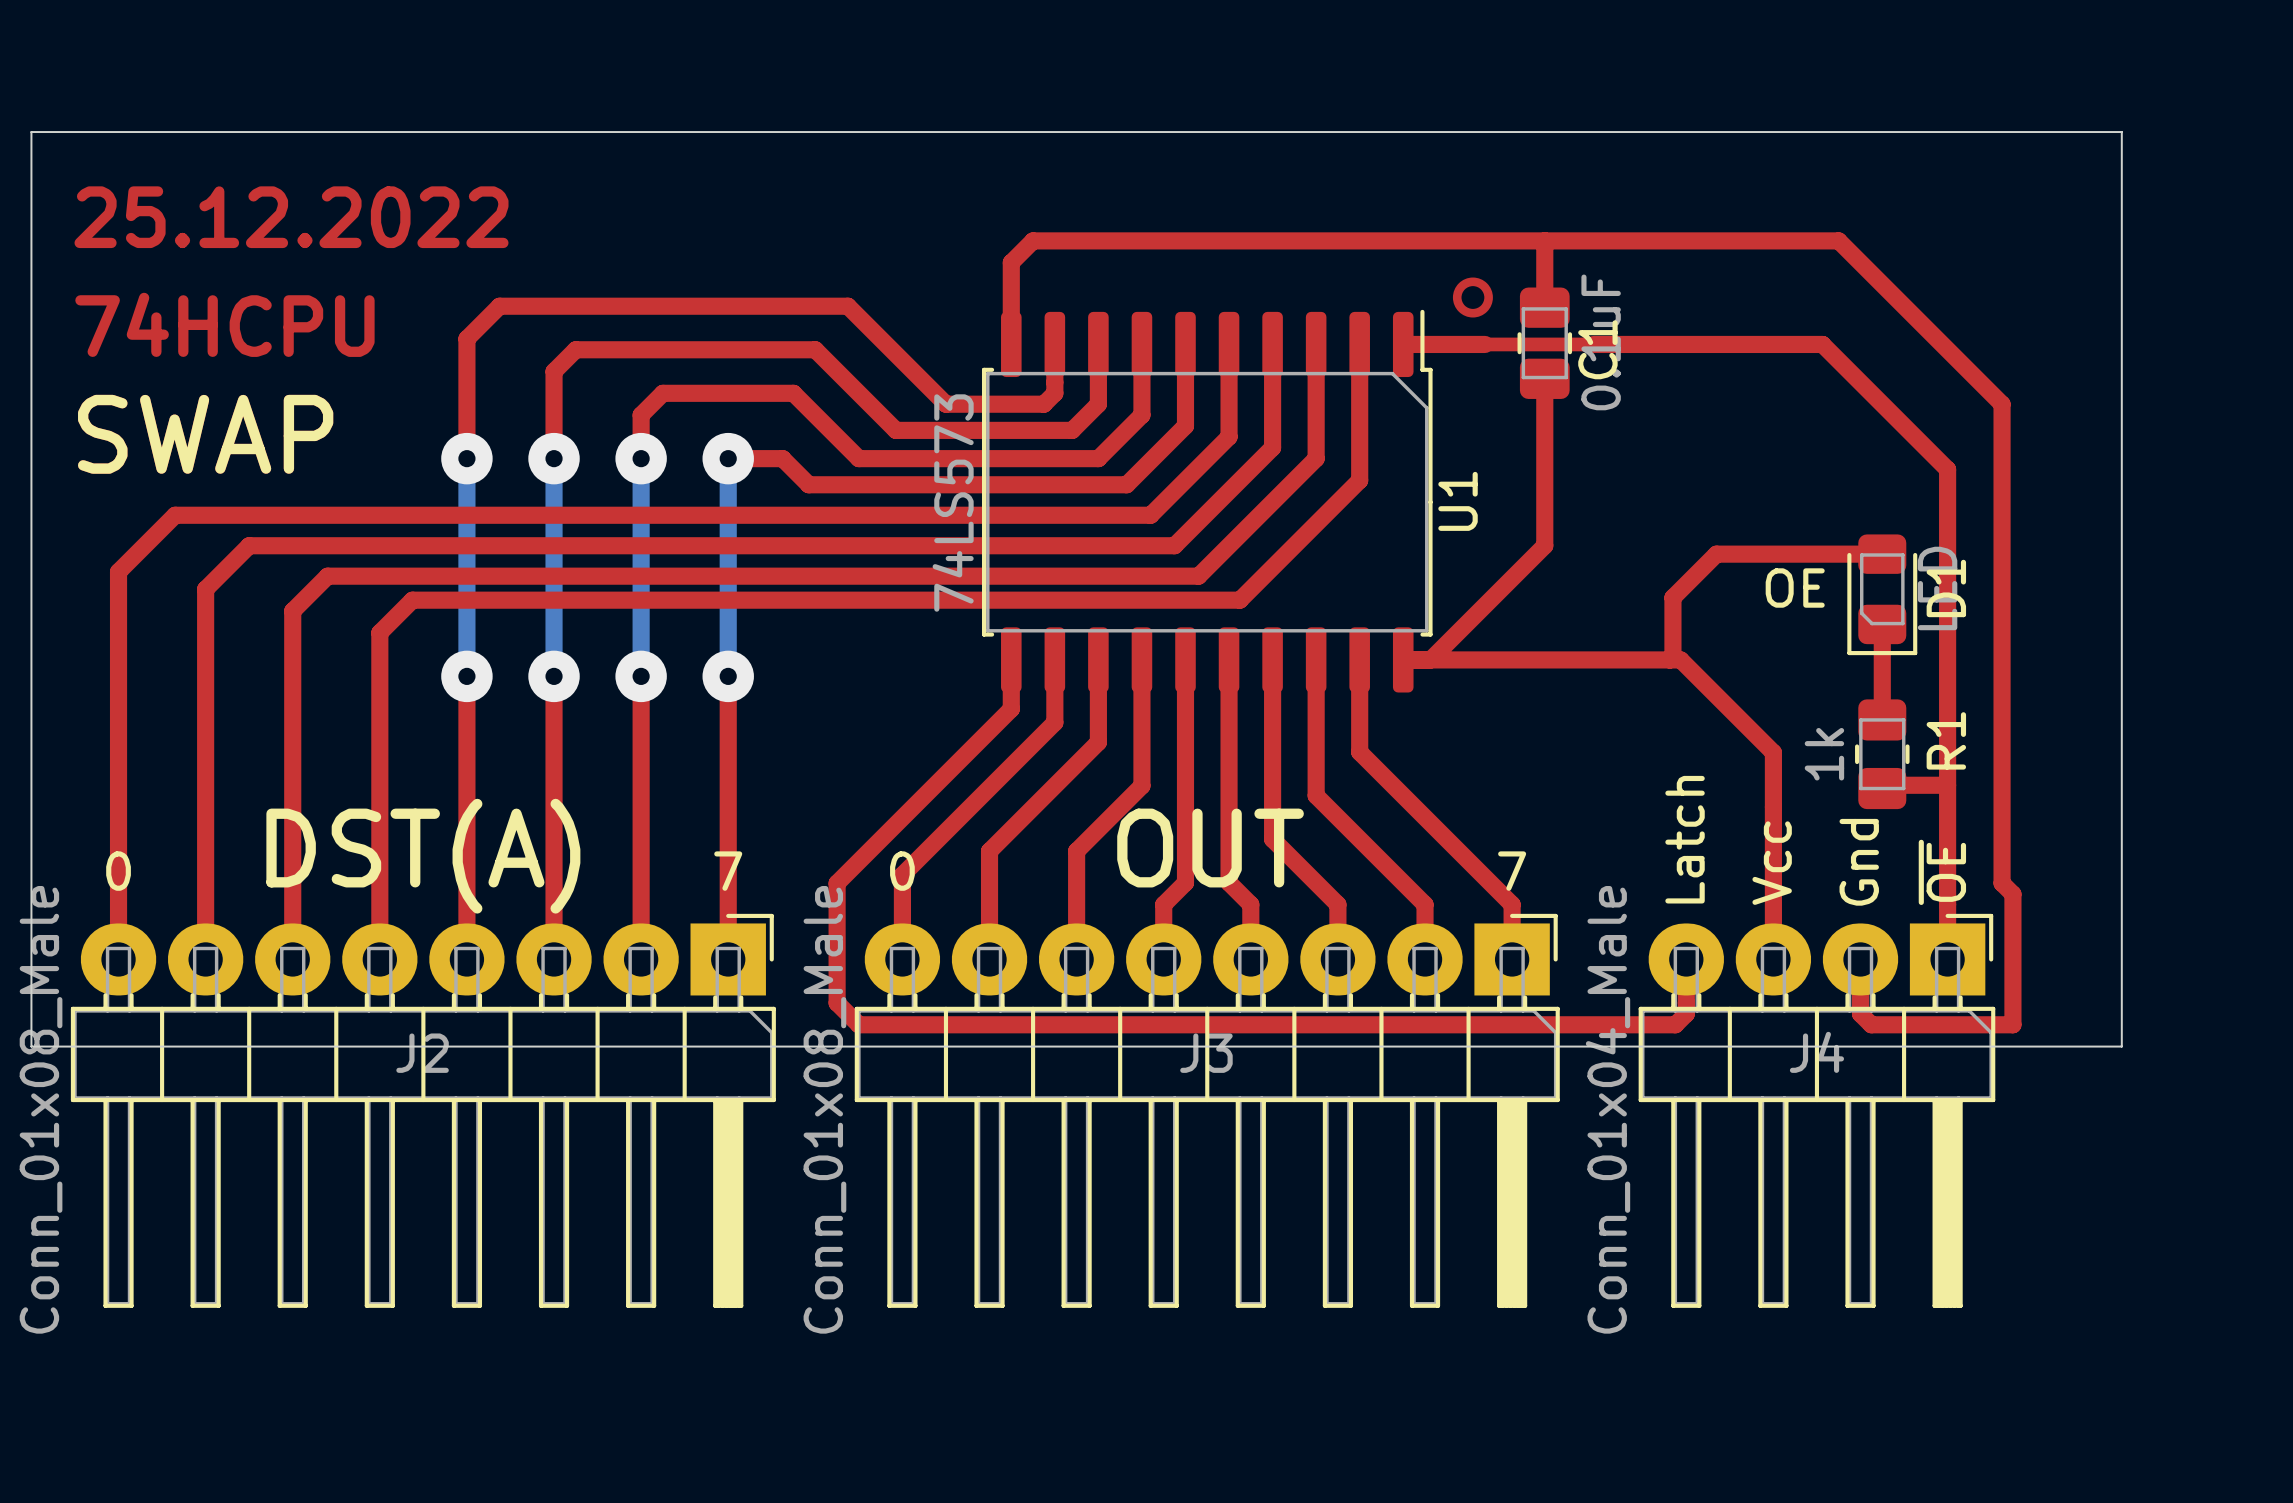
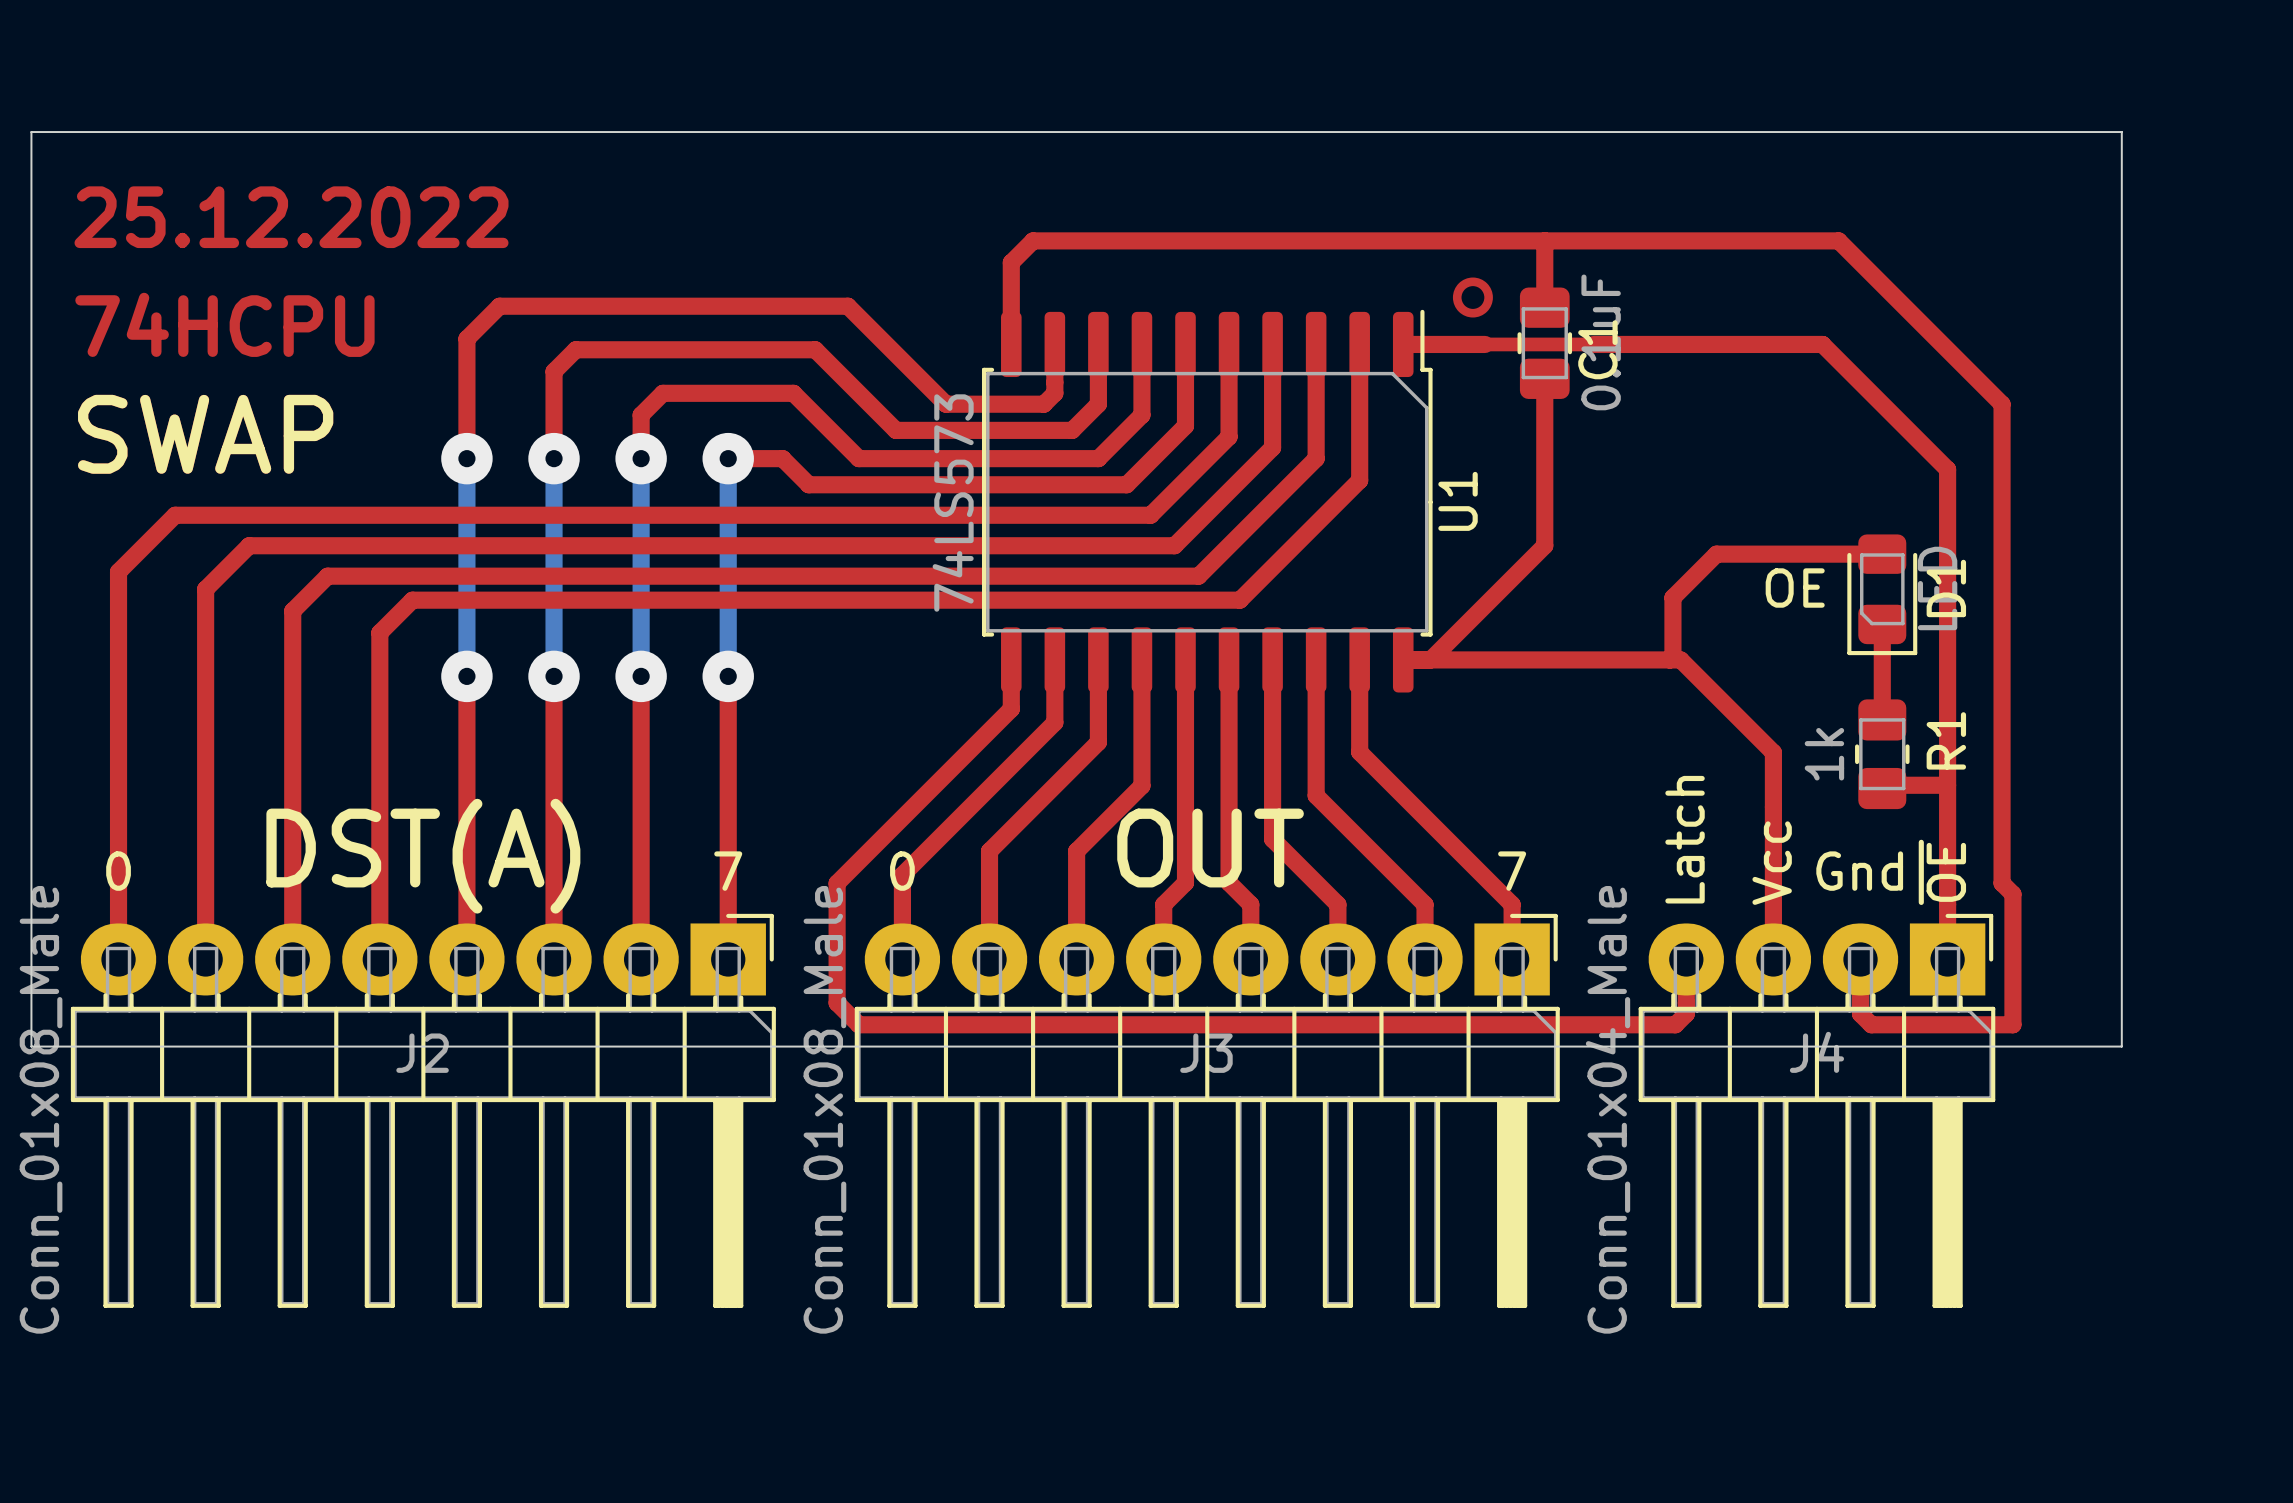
text rotation: 0° (1859, 862) -> 90° clockwise (1859, 871)

